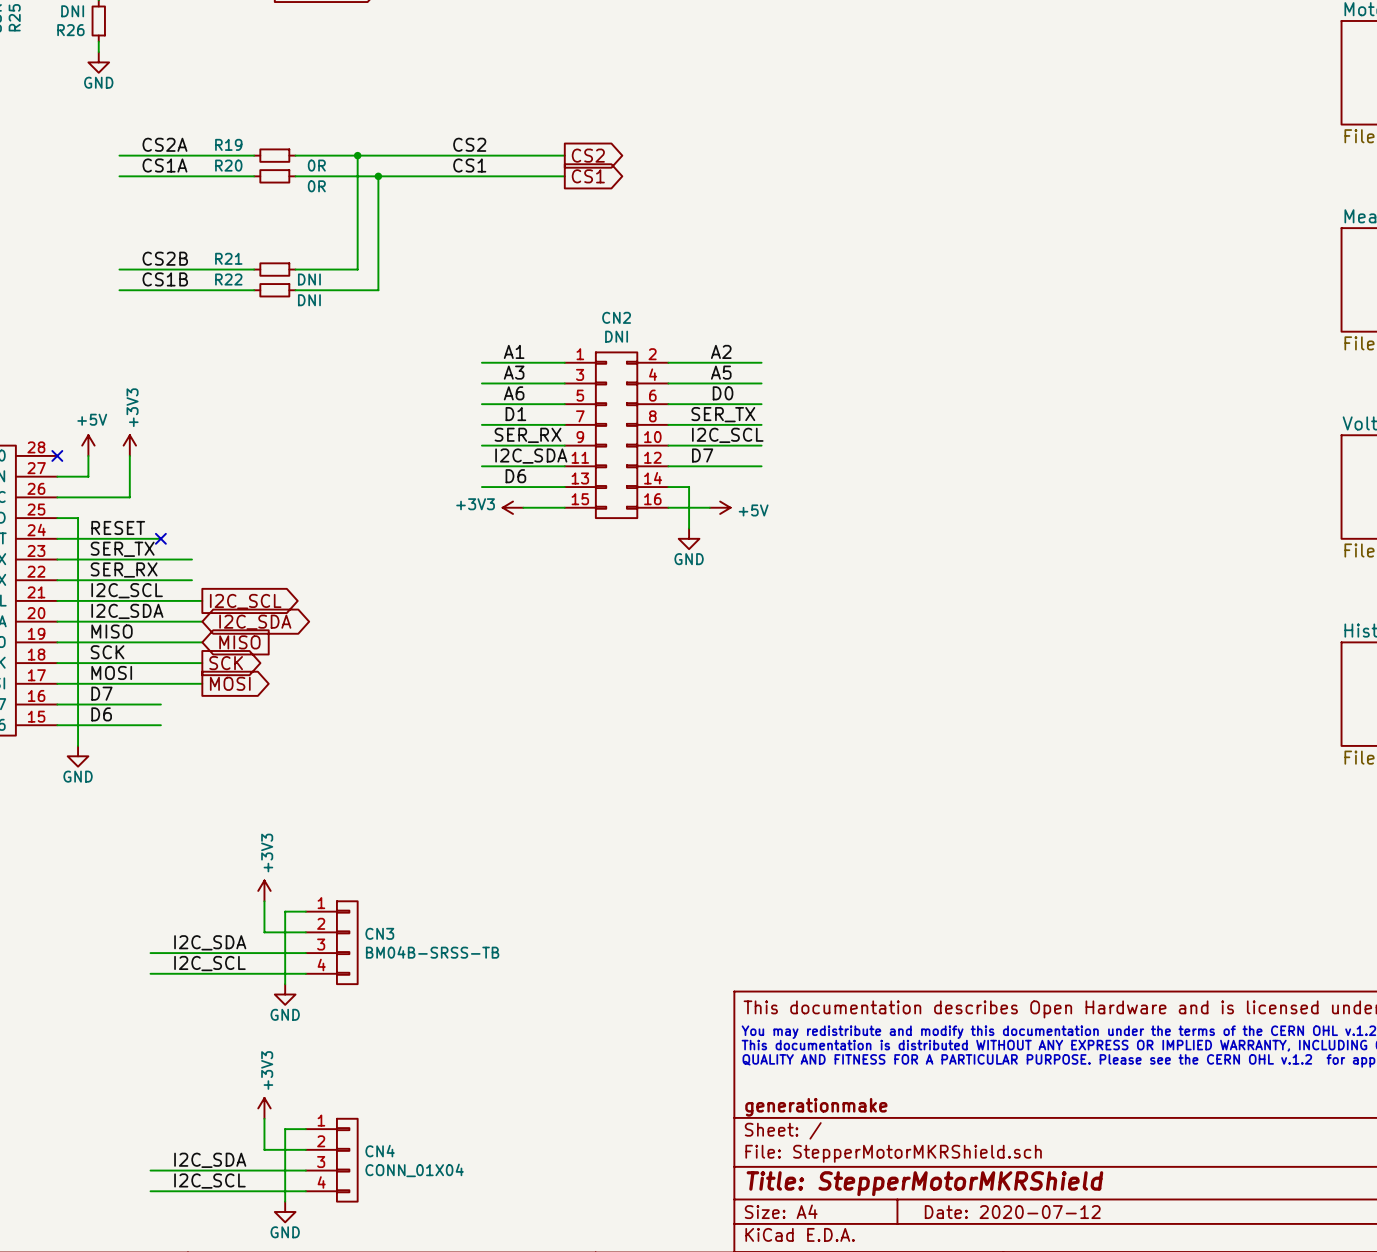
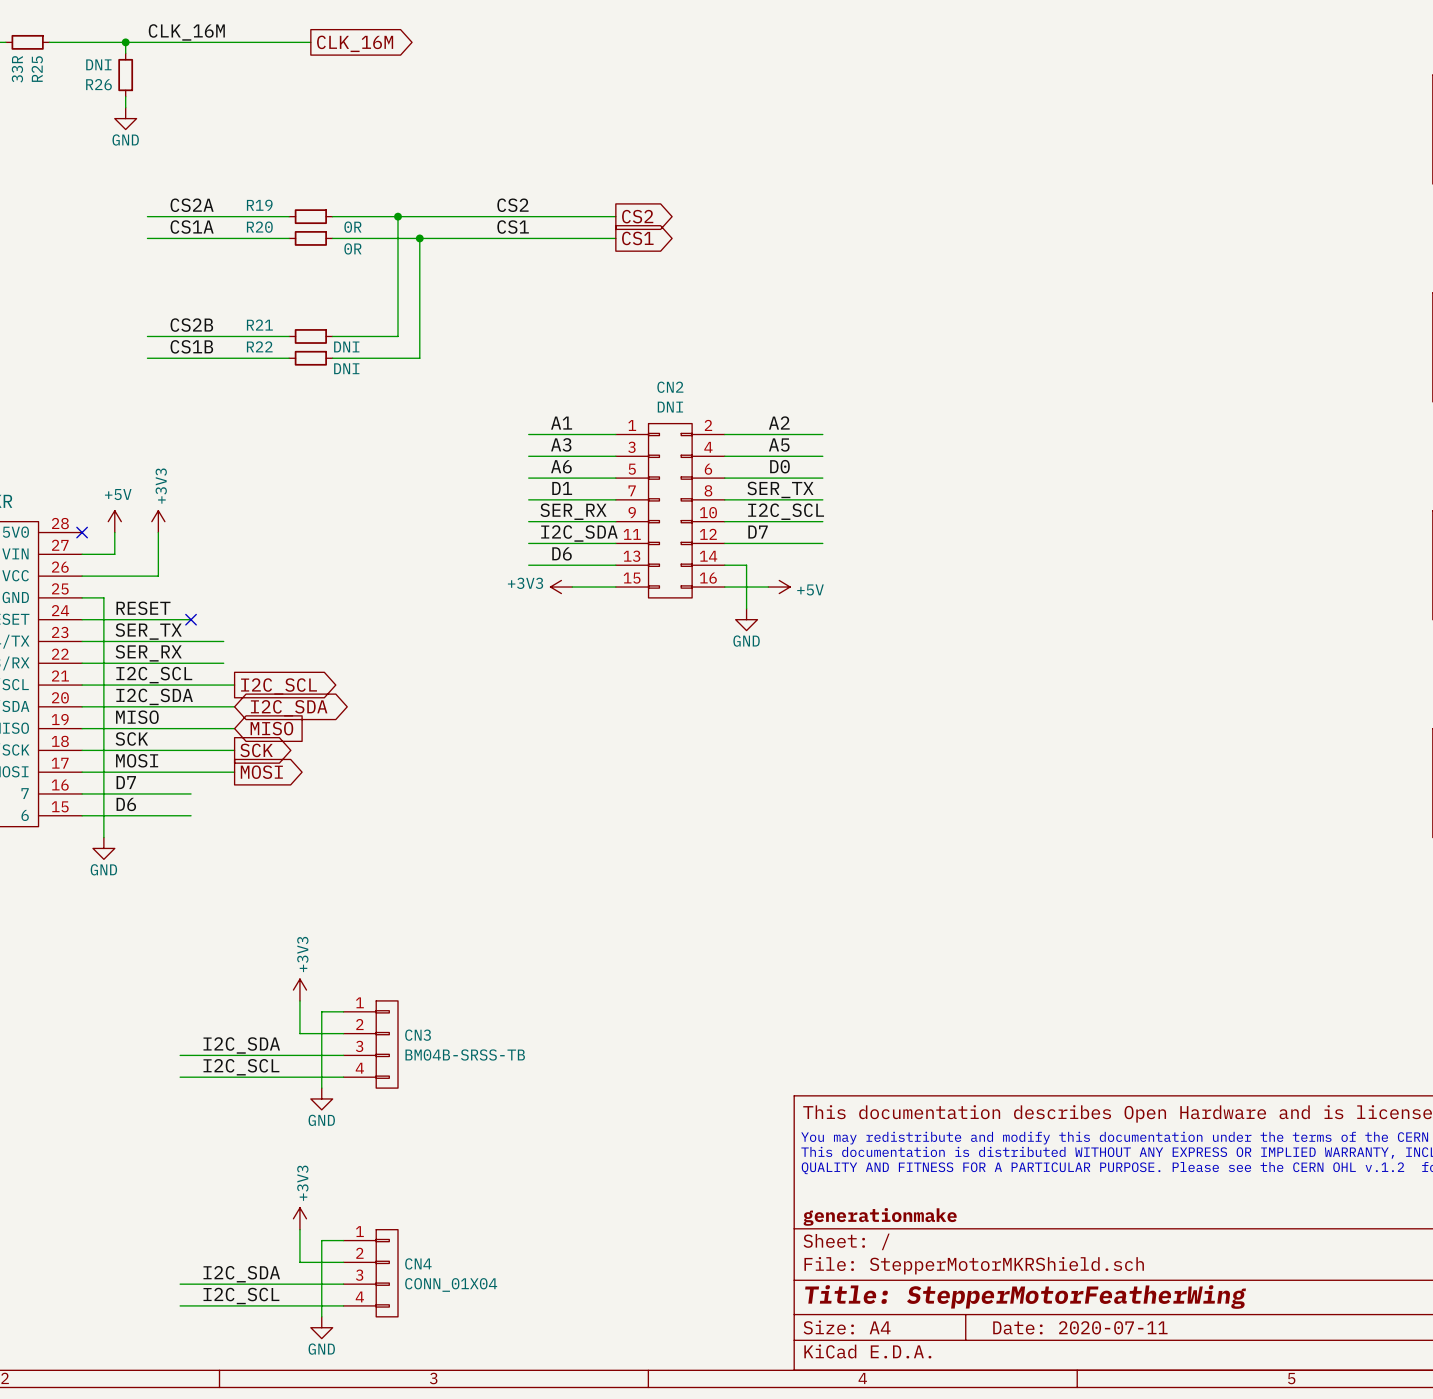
title block: Title: StepperMotorMKRShield (924, 1183) -> Title: StepperMotorFeatherWing (1025, 1297)
title block: Date: 2020-07-12 (1012, 1212) -> Date: 2020-07-11 (1080, 1327)

